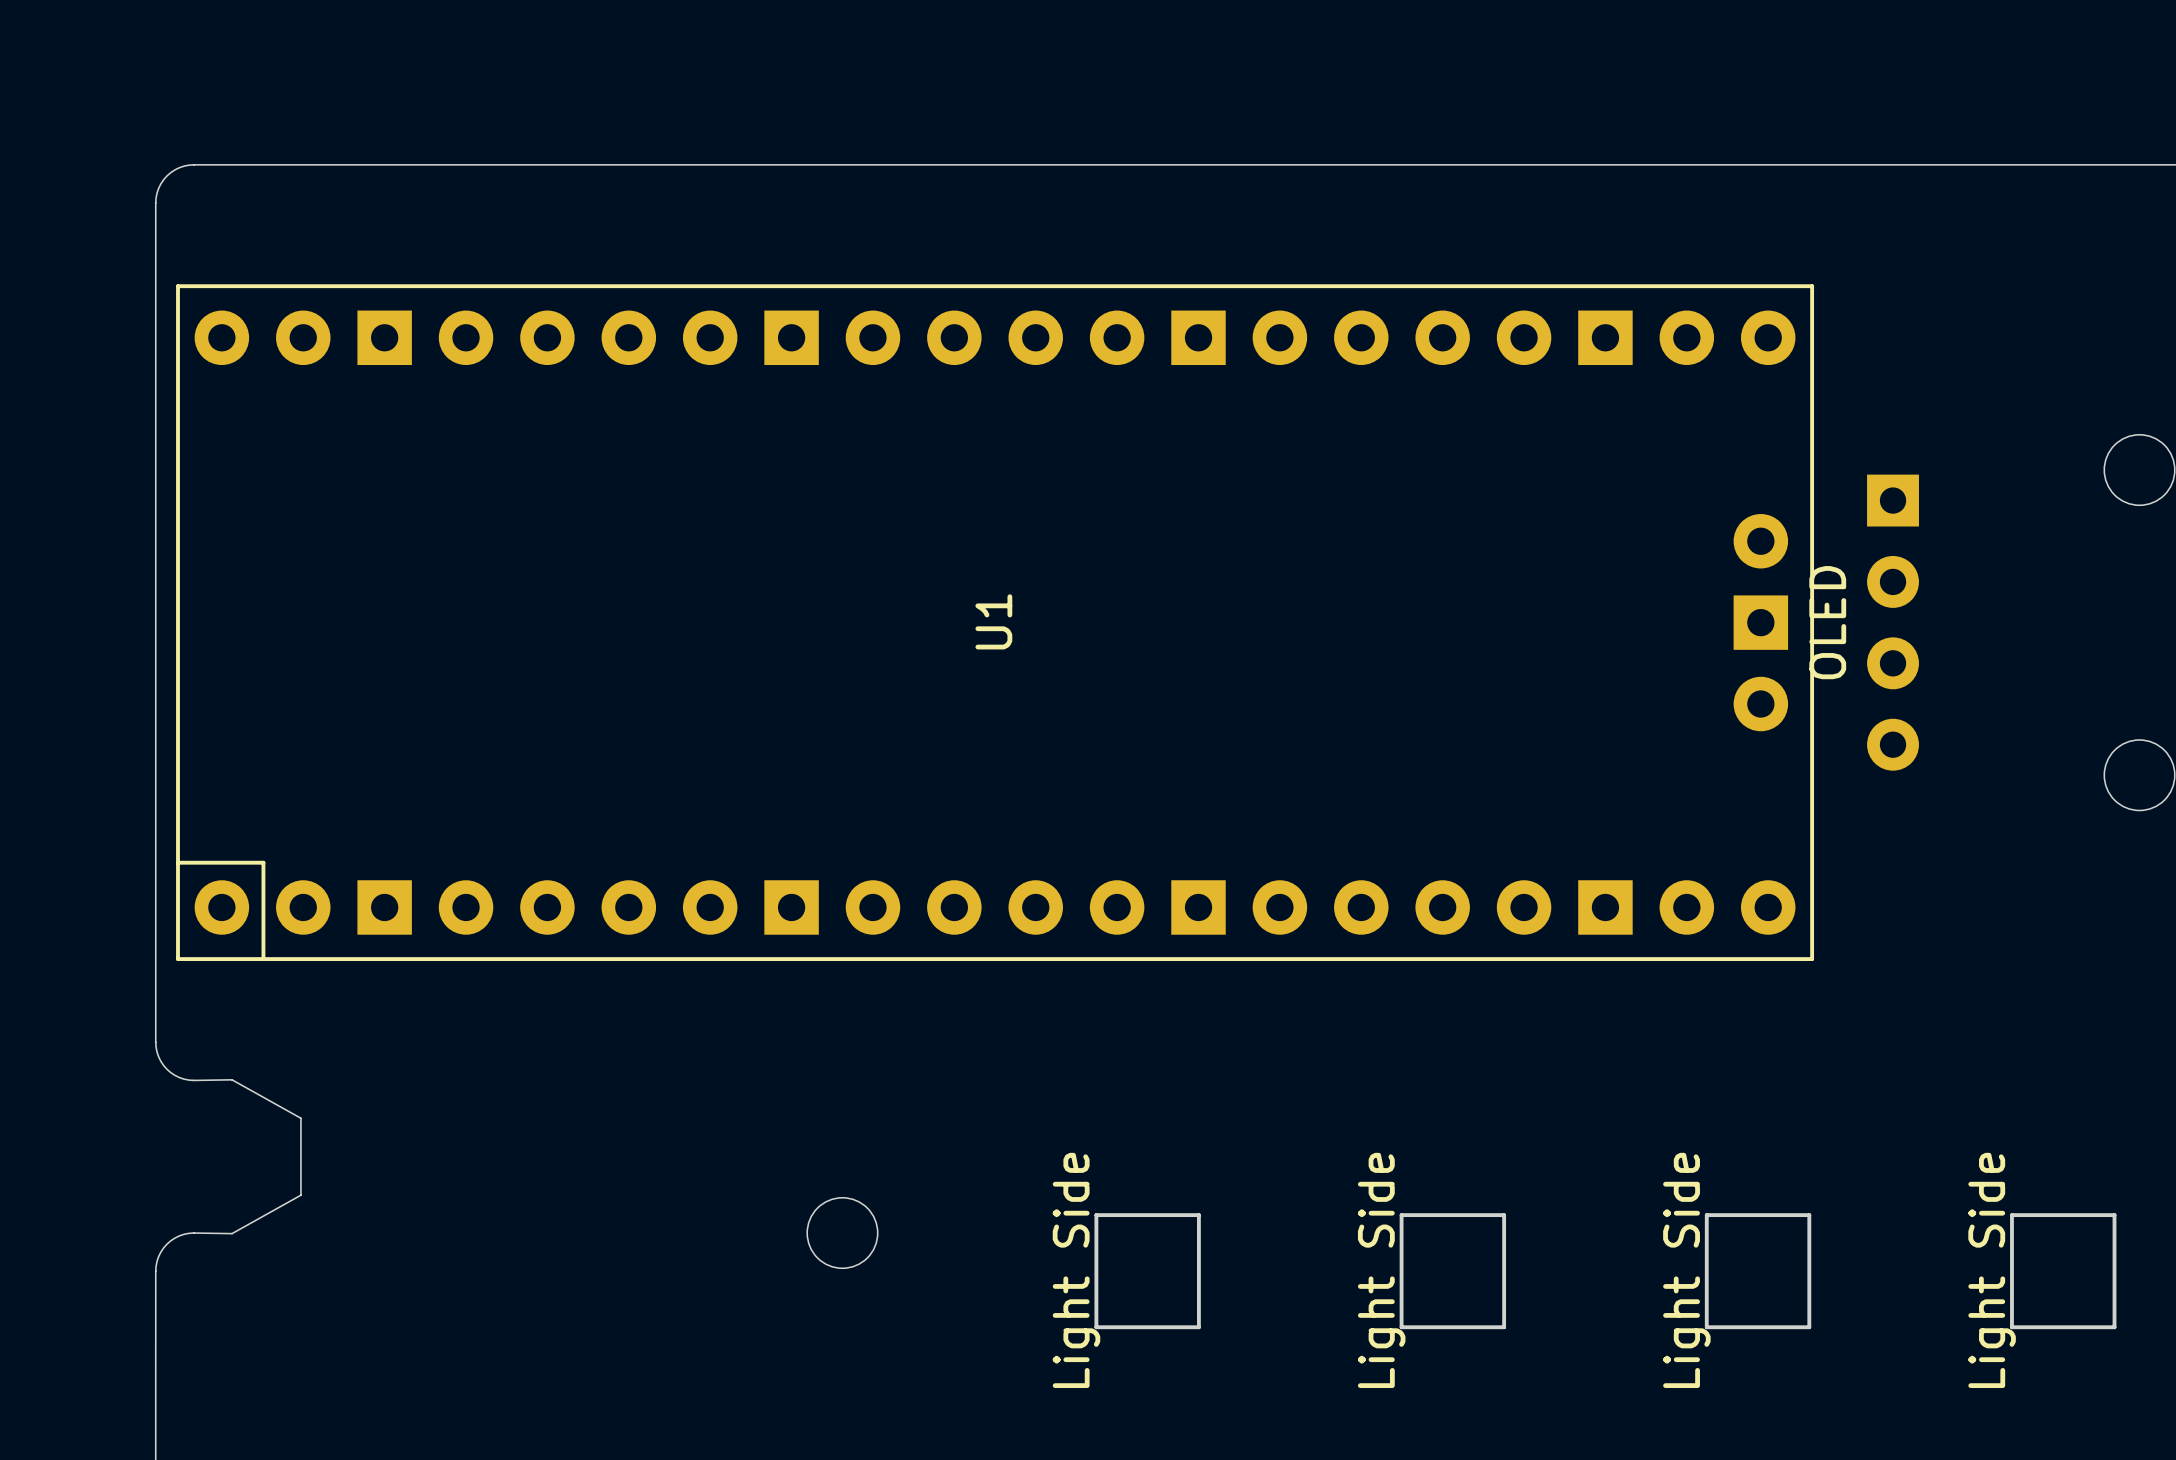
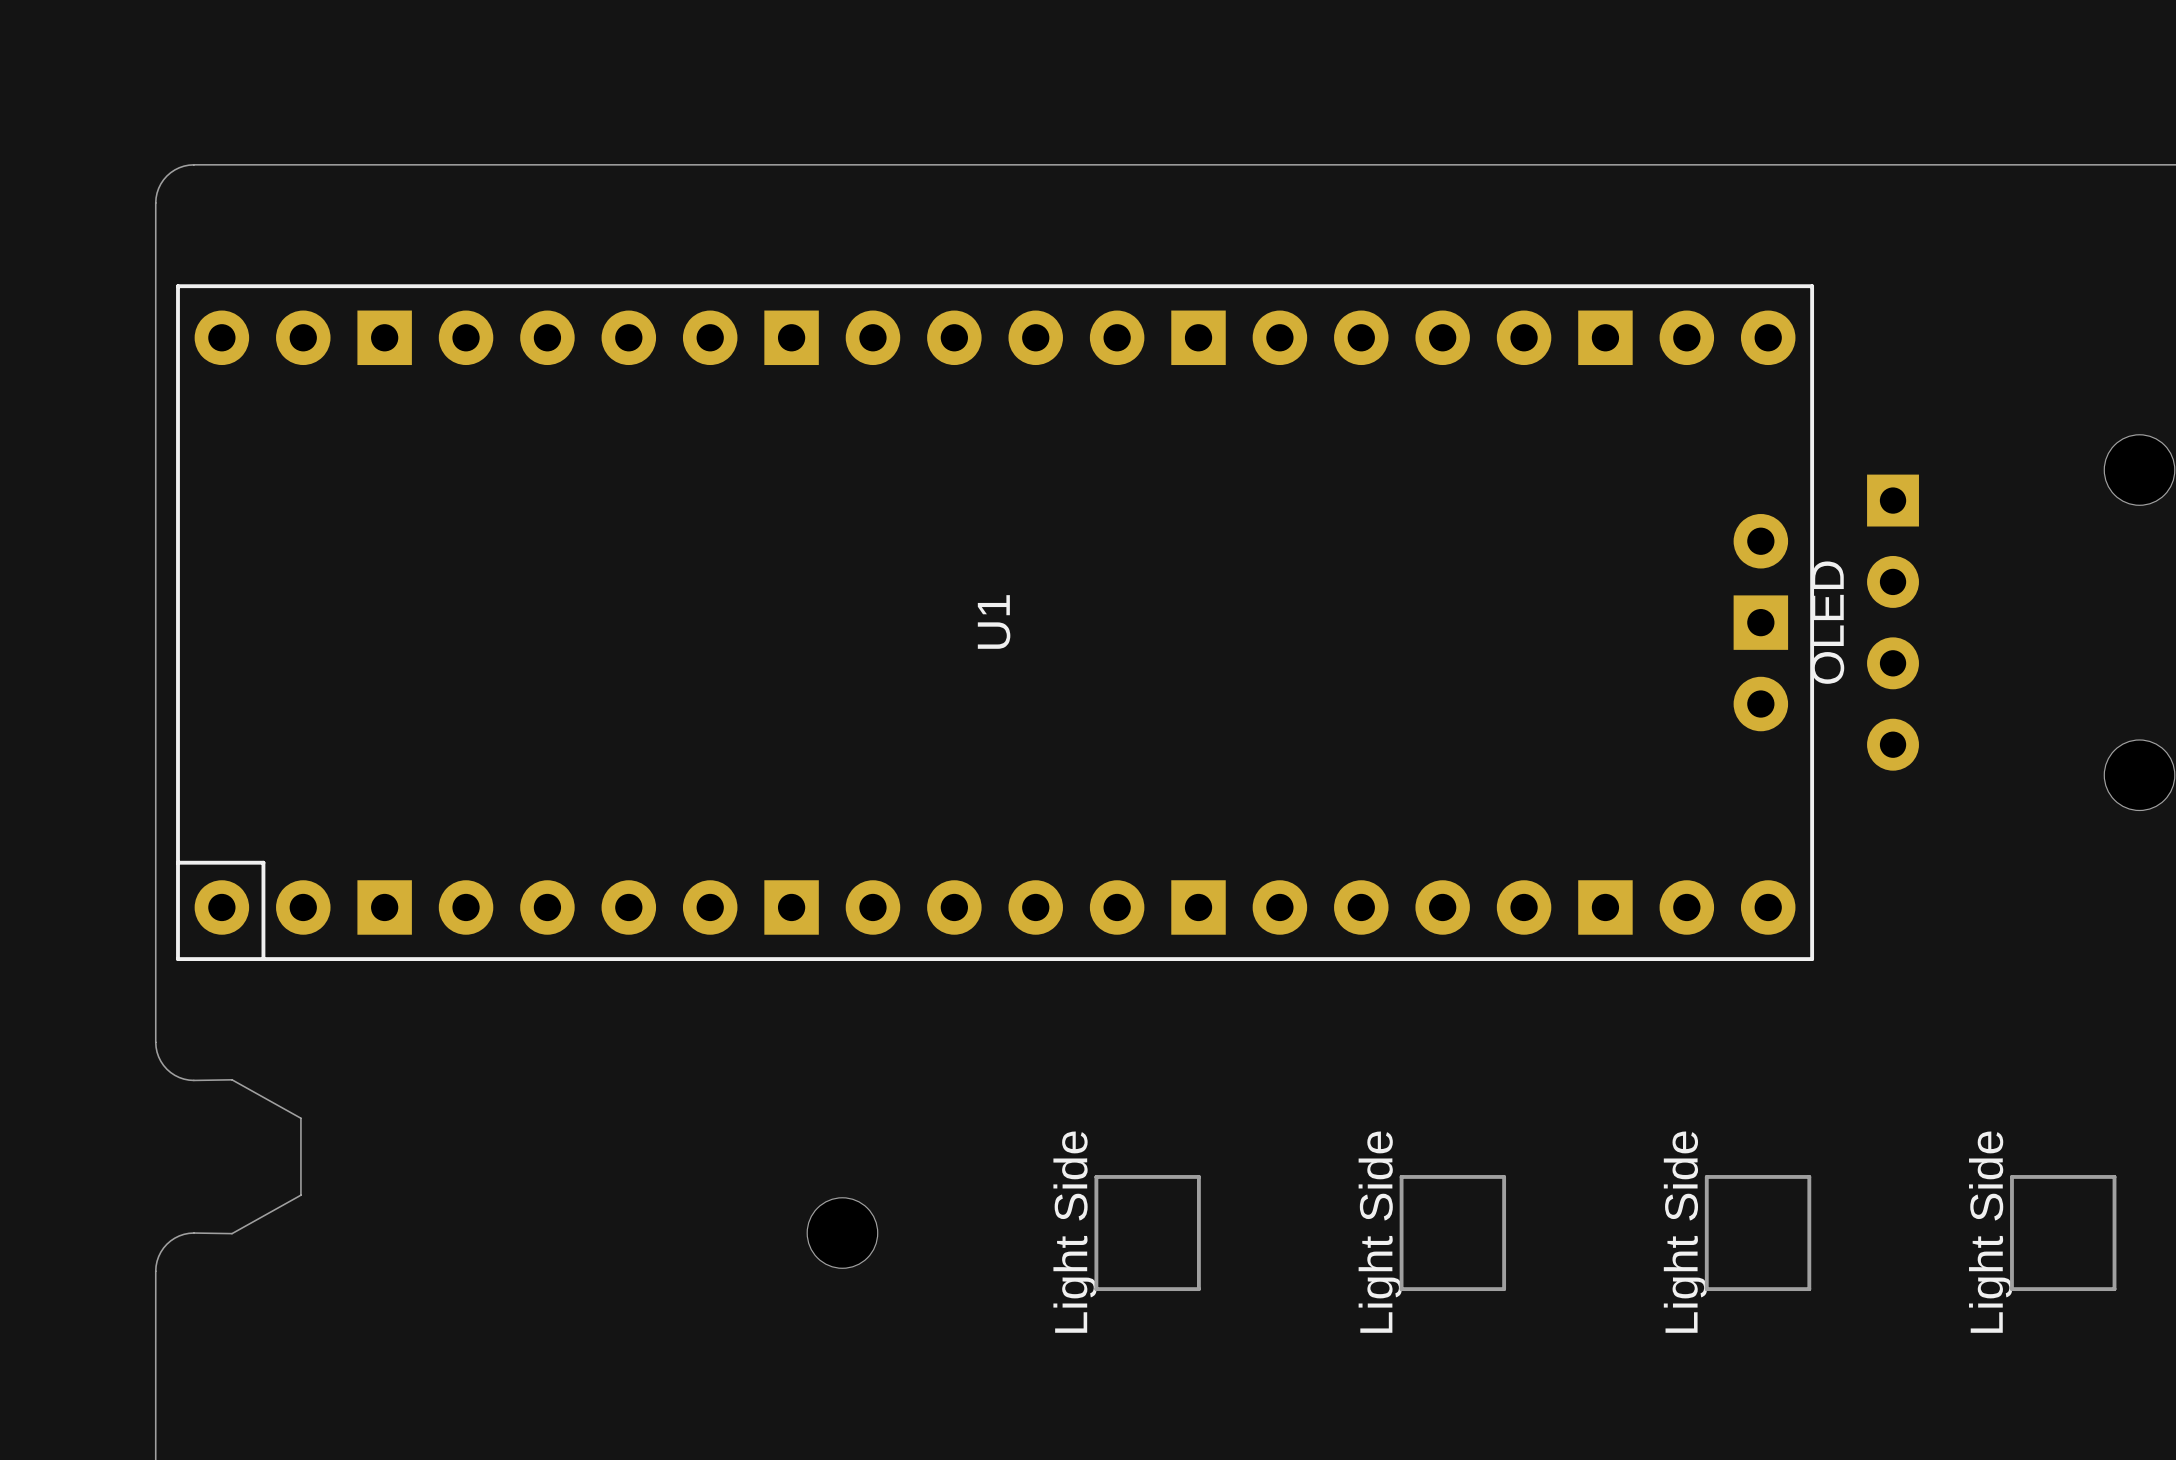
part position: (1147, 1271) -> (1147, 1233)
part position: (1452, 1271) -> (1452, 1233)
part position: (1758, 1271) -> (1758, 1233)
part position: (2063, 1271) -> (2063, 1233)

